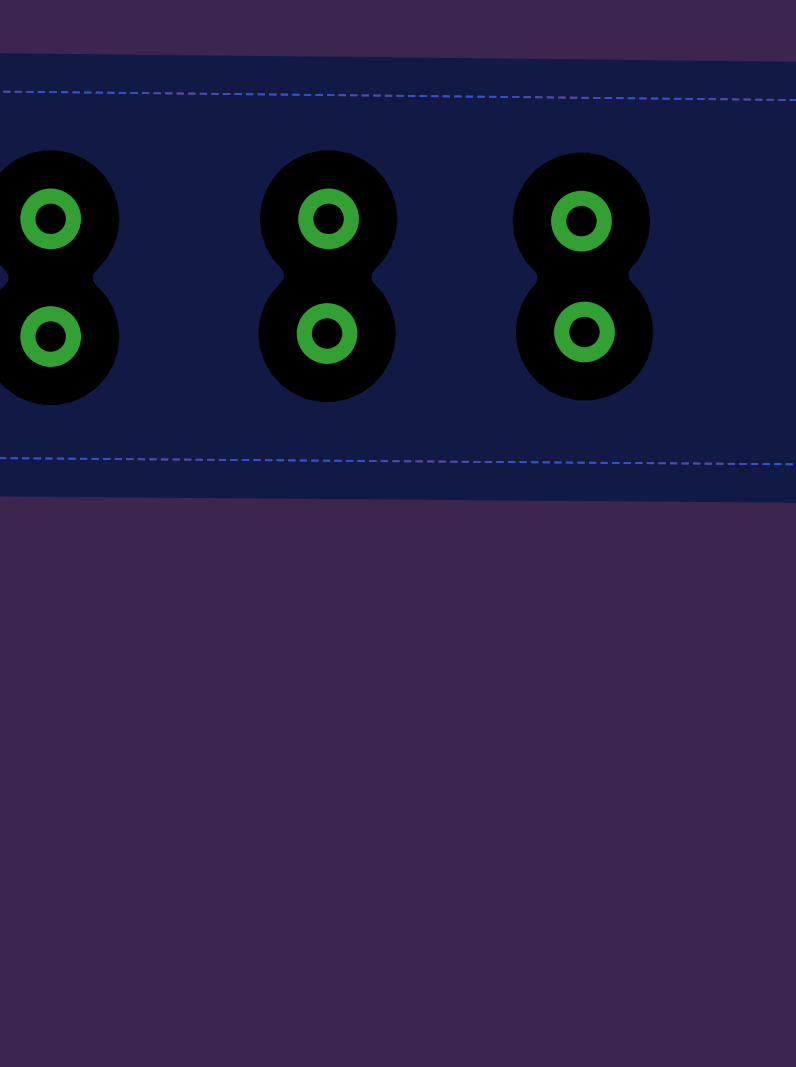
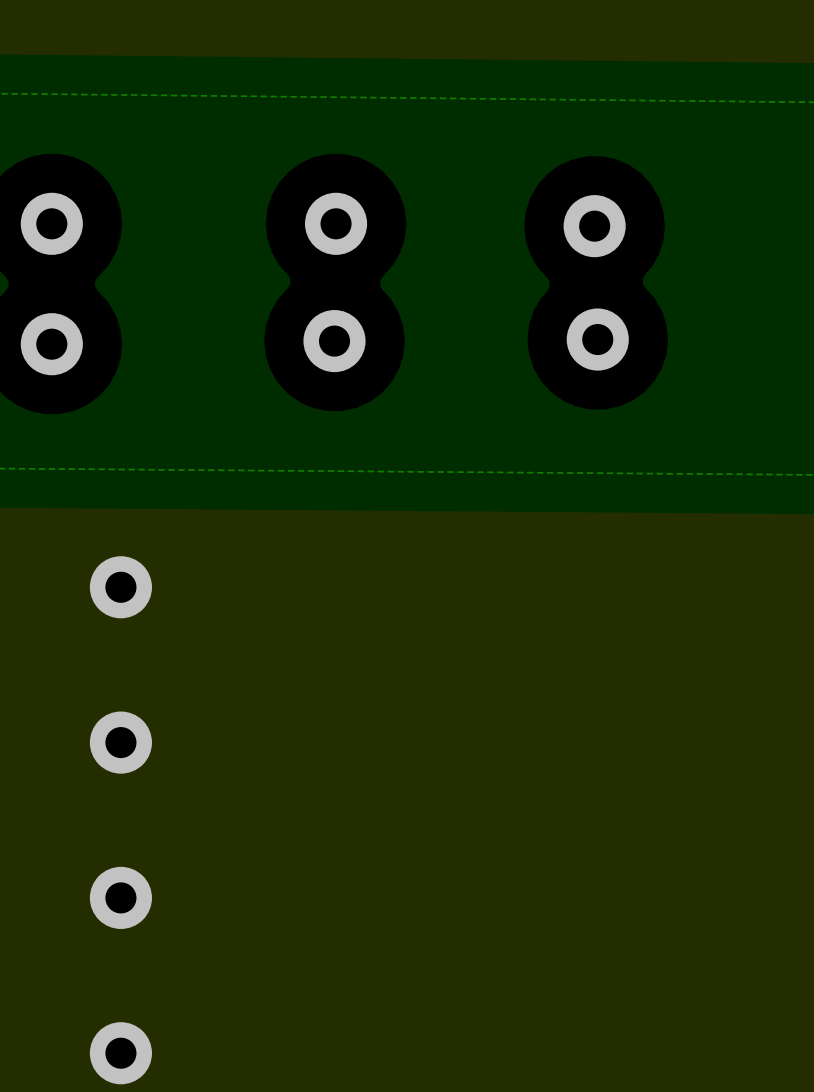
via: none -> (120, 587)
via: none -> (120, 742)
via: none -> (120, 897)
via: none -> (120, 1053)

